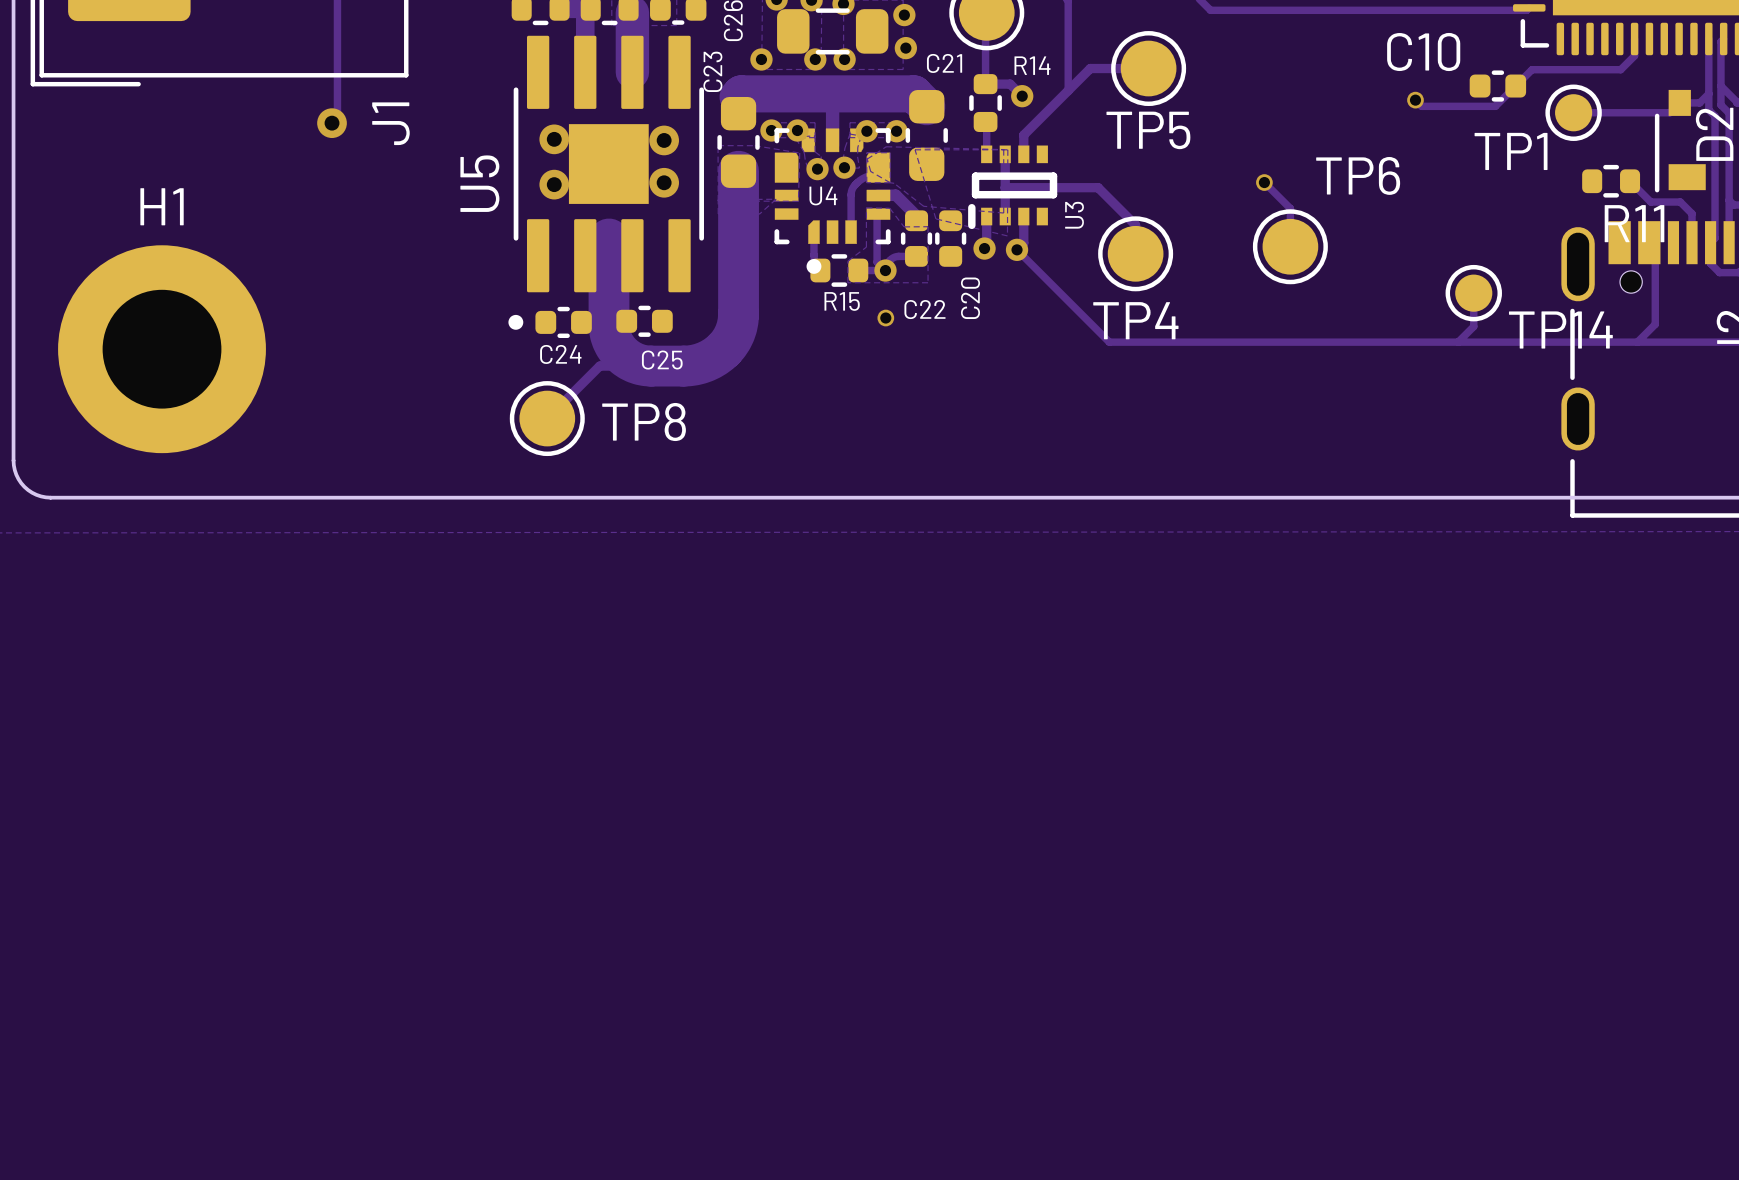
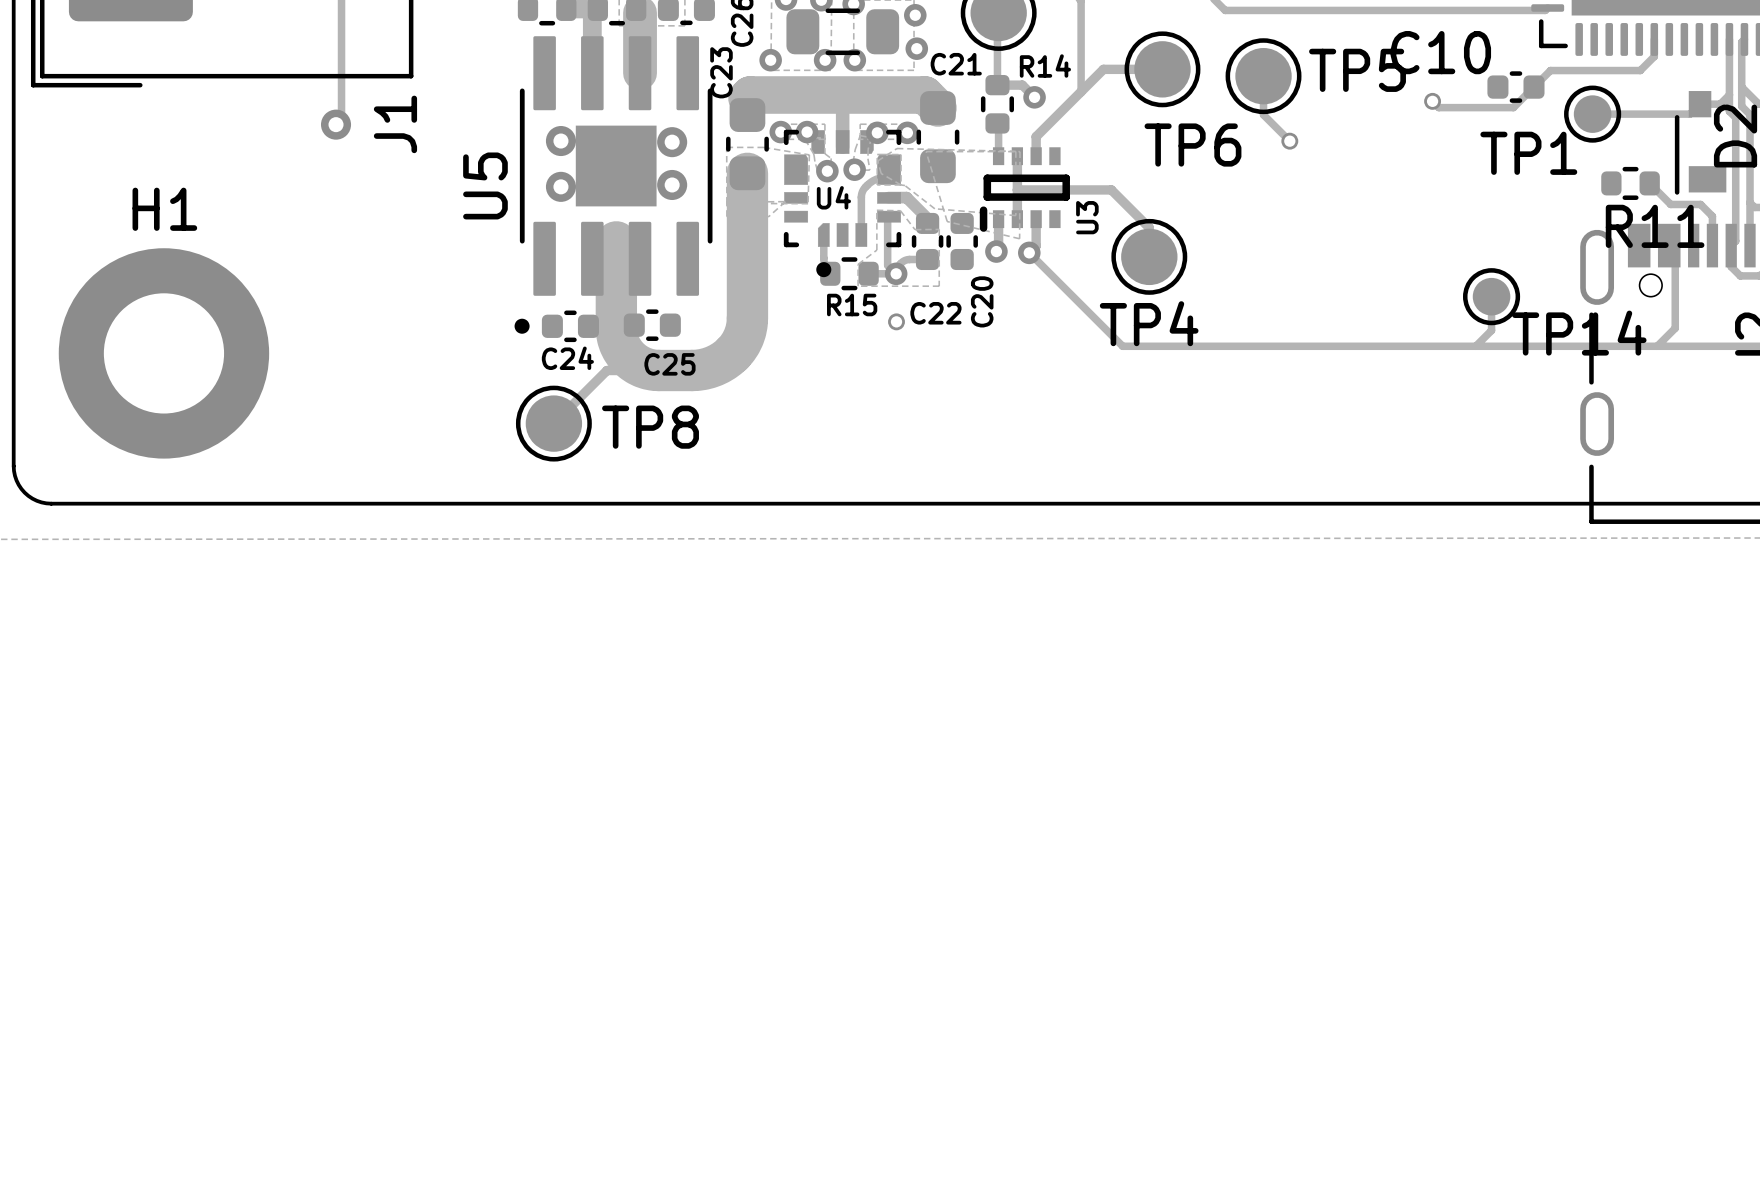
track: none -> (1263, 76) (1263, 114) (1289, 141)
TP5 name position: TP5 (1148, 130) -> TP5 (1357, 70)
TP6 name position: TP6 (1358, 175) -> TP6 (1192, 145)
track: (1264, 182) (1290, 208) (1290, 246) -> none
via position: (1264, 182) -> (1289, 141)
TP6 position: (1290, 246) -> (1263, 76)

